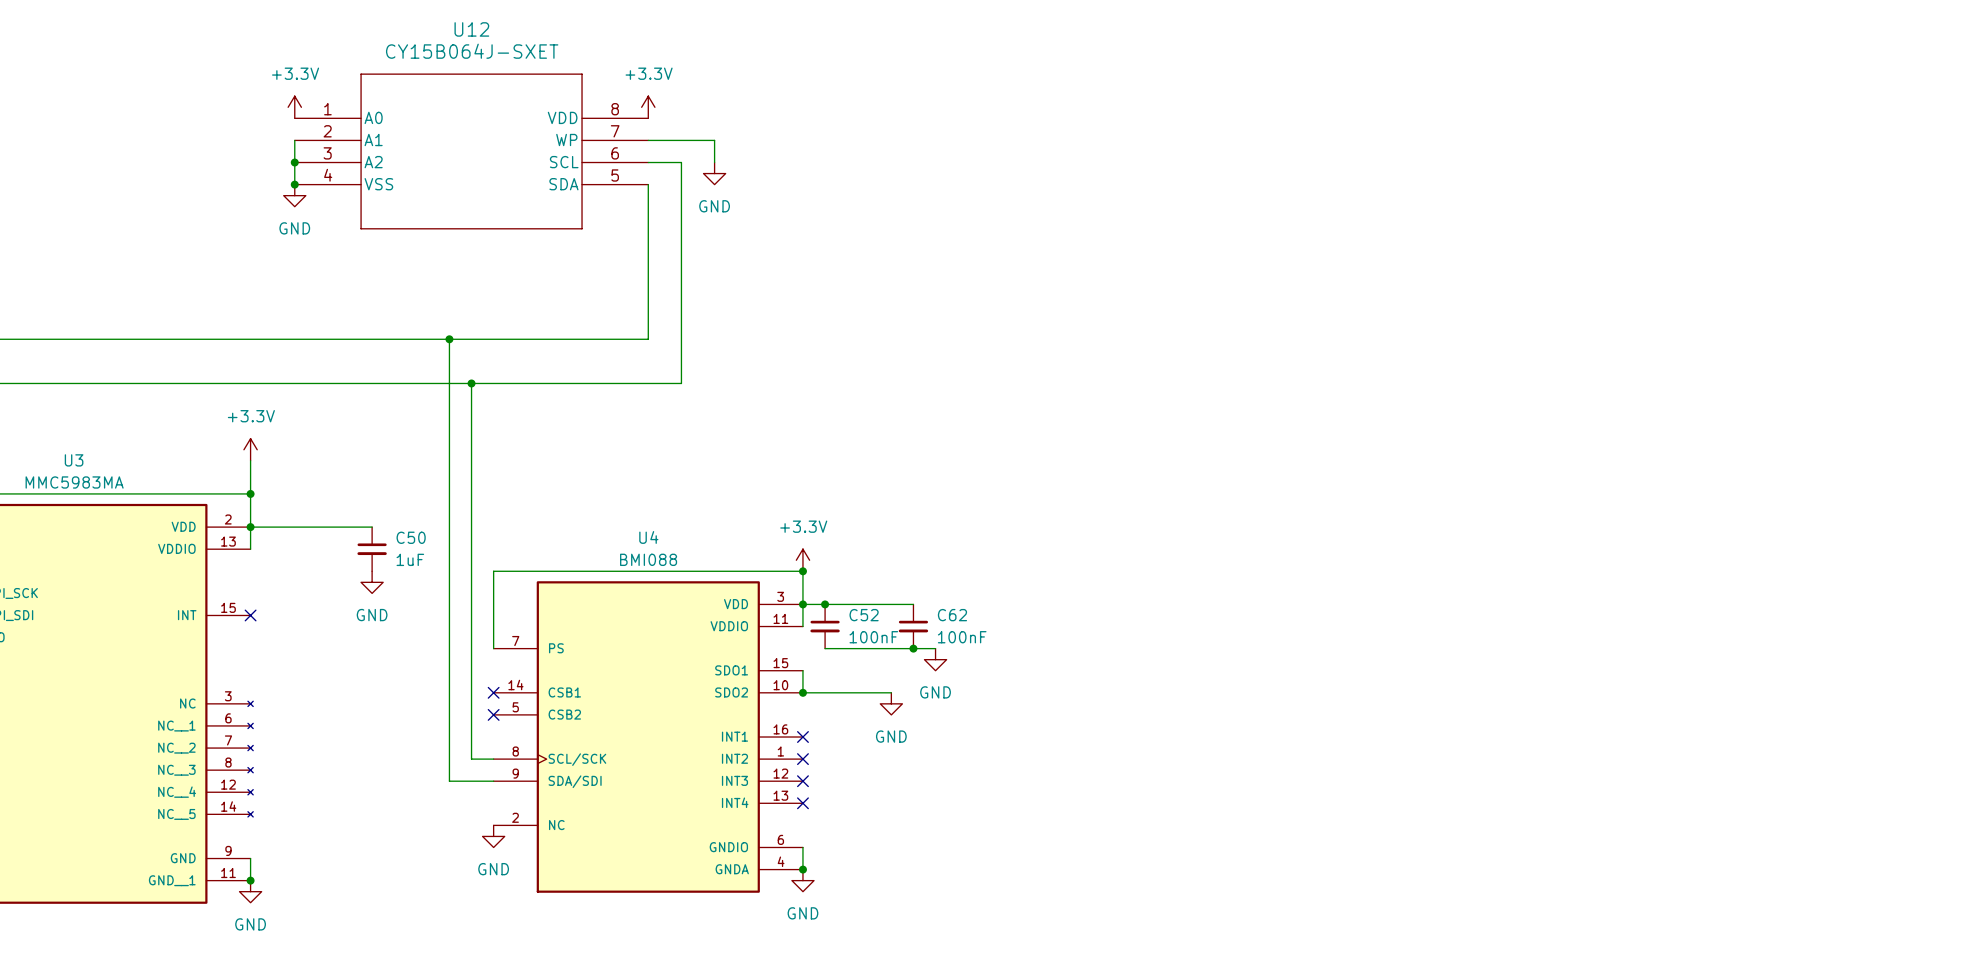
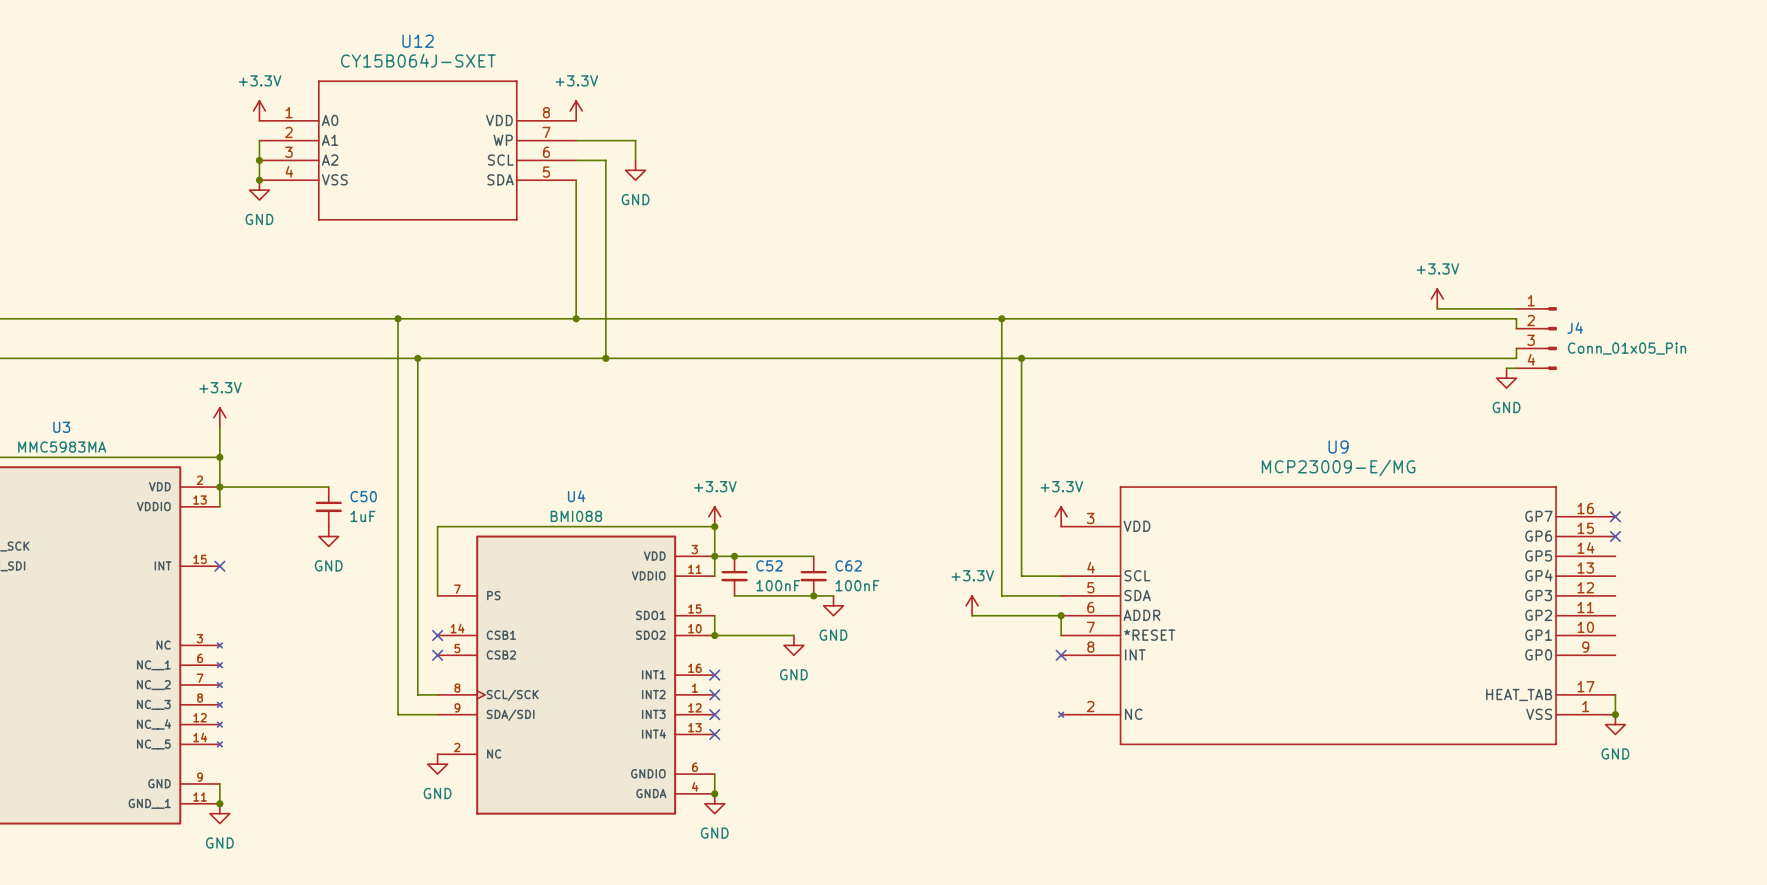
power symbol: none -> +3.3V (1437, 298)
wire: none -> (1437, 308) (1516, 308)
wire: none -> (576, 318) (1516, 318) (1516, 328)
junction: none -> (576, 318)
wire: none -> (1001, 318) (1001, 595) (1061, 595)
junction: none -> (1001, 318)
J4: none -> Conn_01x05_Pin (1536, 338)
wire: none -> (1516, 348) (1516, 358) (605, 358)
junction: none -> (605, 358)
wire: none -> (1021, 358) (1021, 576) (1061, 576)
junction: none -> (1021, 358)
wire: none -> (1506, 368) (1516, 368)
power symbol: none -> GND (1506, 378)
power symbol: none -> +3.3V (1061, 516)
no-connect mark: none -> (1615, 516)
no-connect mark: none -> (1615, 536)
power symbol: none -> +3.3V (972, 605)
wire: none -> (972, 615) (1061, 615) (1061, 635)
junction: none -> (1061, 615)
U9: none -> MCP23009-E/MG (1337, 615)
no-connect mark: none -> (1061, 655)
wire: none -> (1615, 694) (1615, 714)
junction: none -> (1615, 714)
power symbol: none -> GND (1615, 724)

